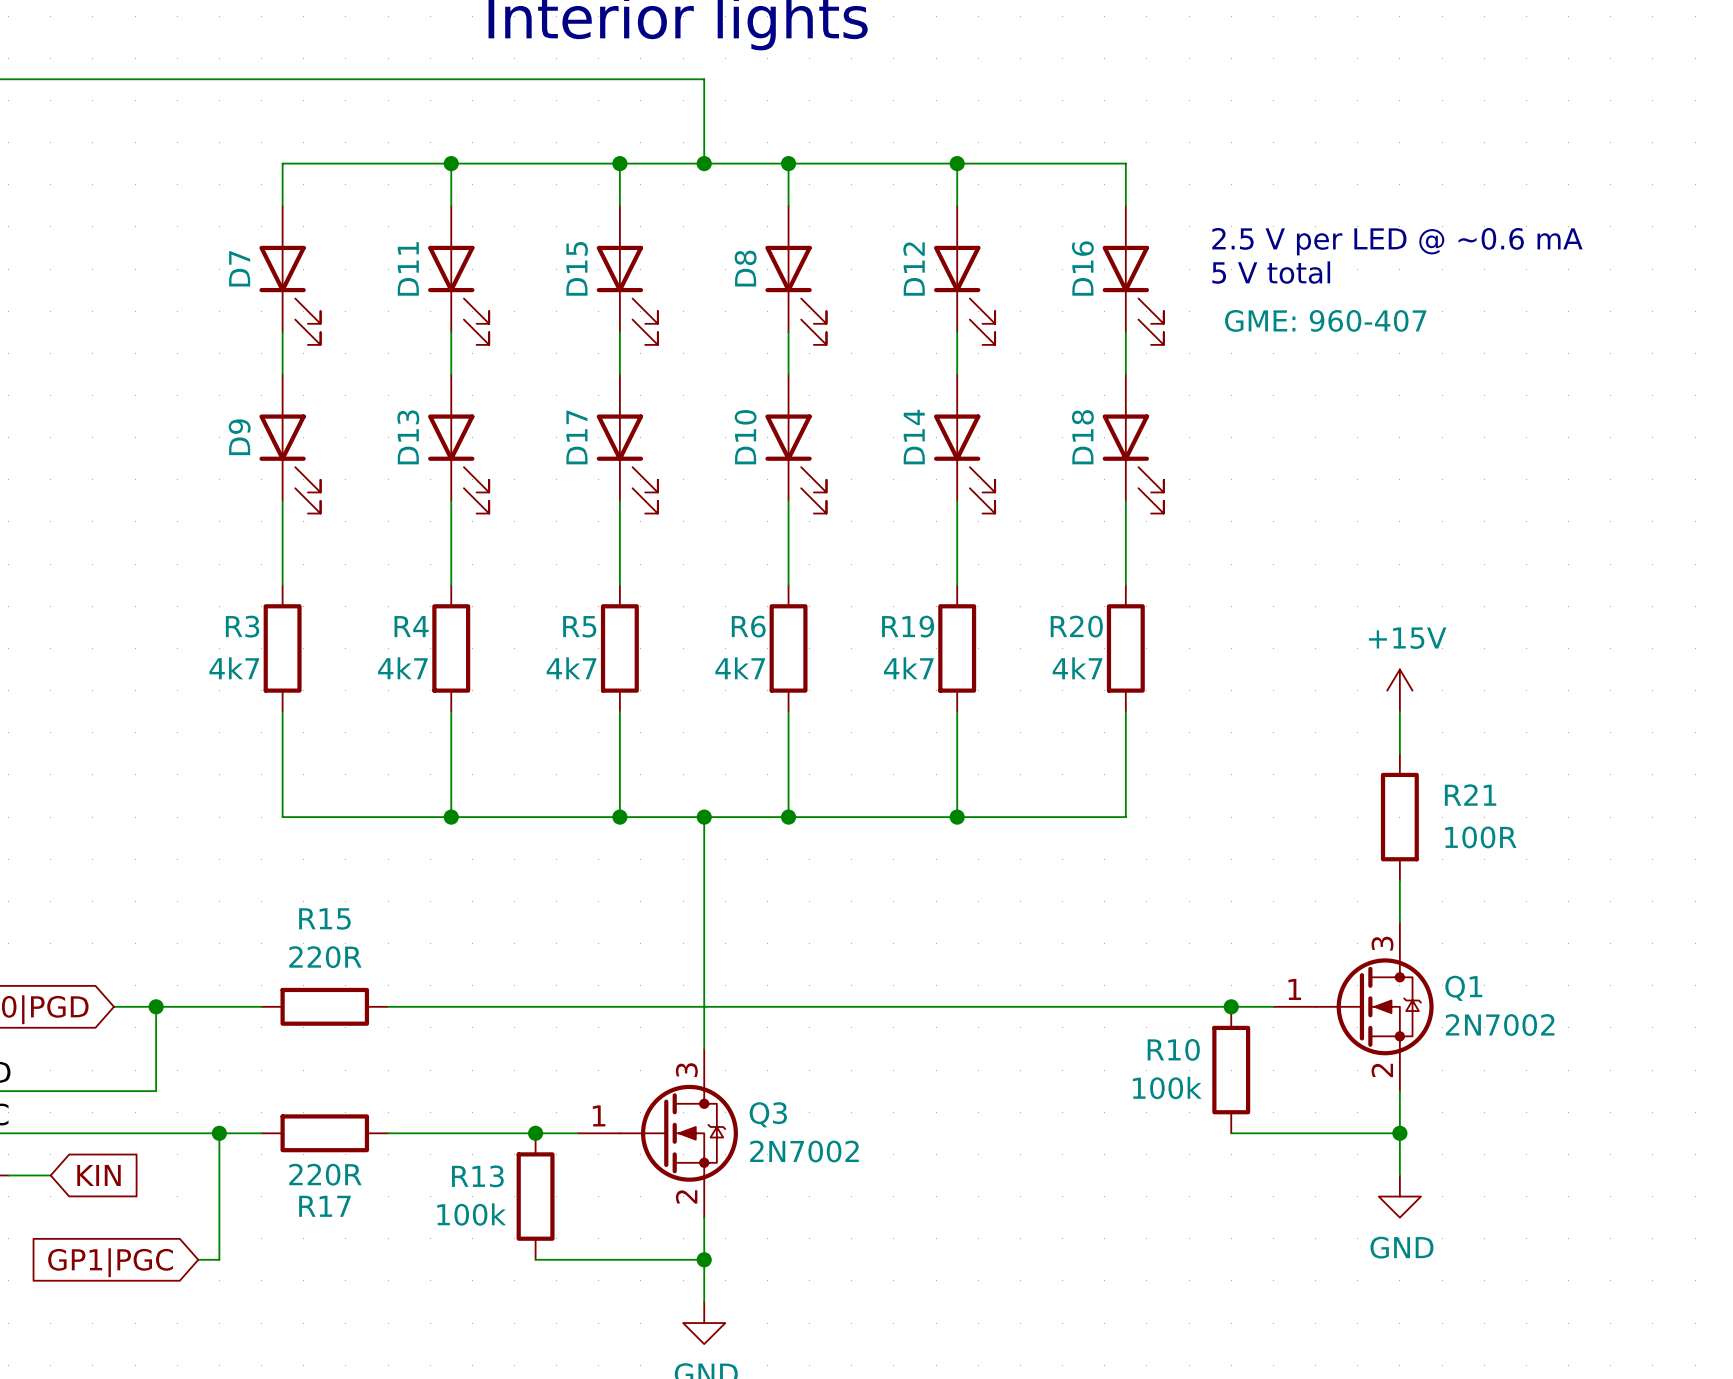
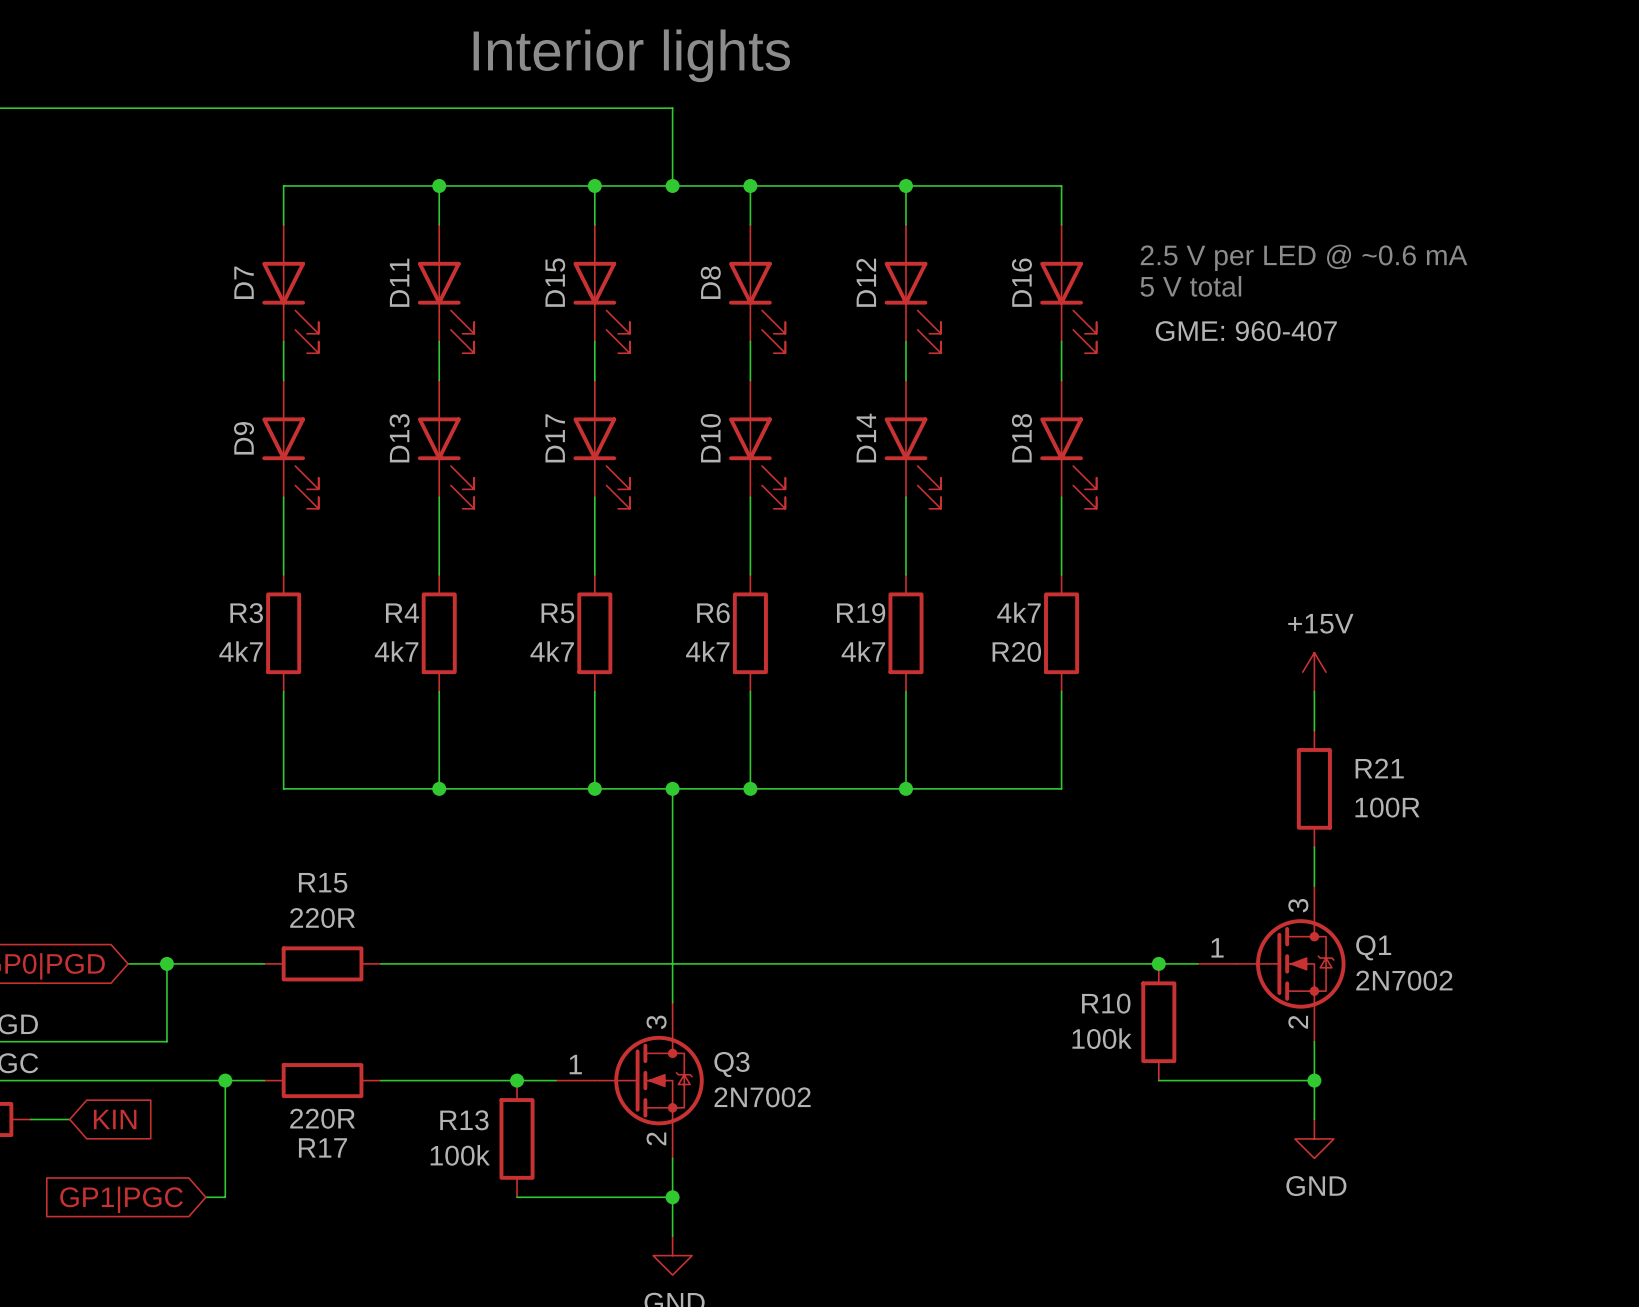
R20 name position: R20 (1076, 626) -> R20 (1016, 652)
R20 value position: 4k7 (1077, 668) -> 4k7 (1018, 612)

